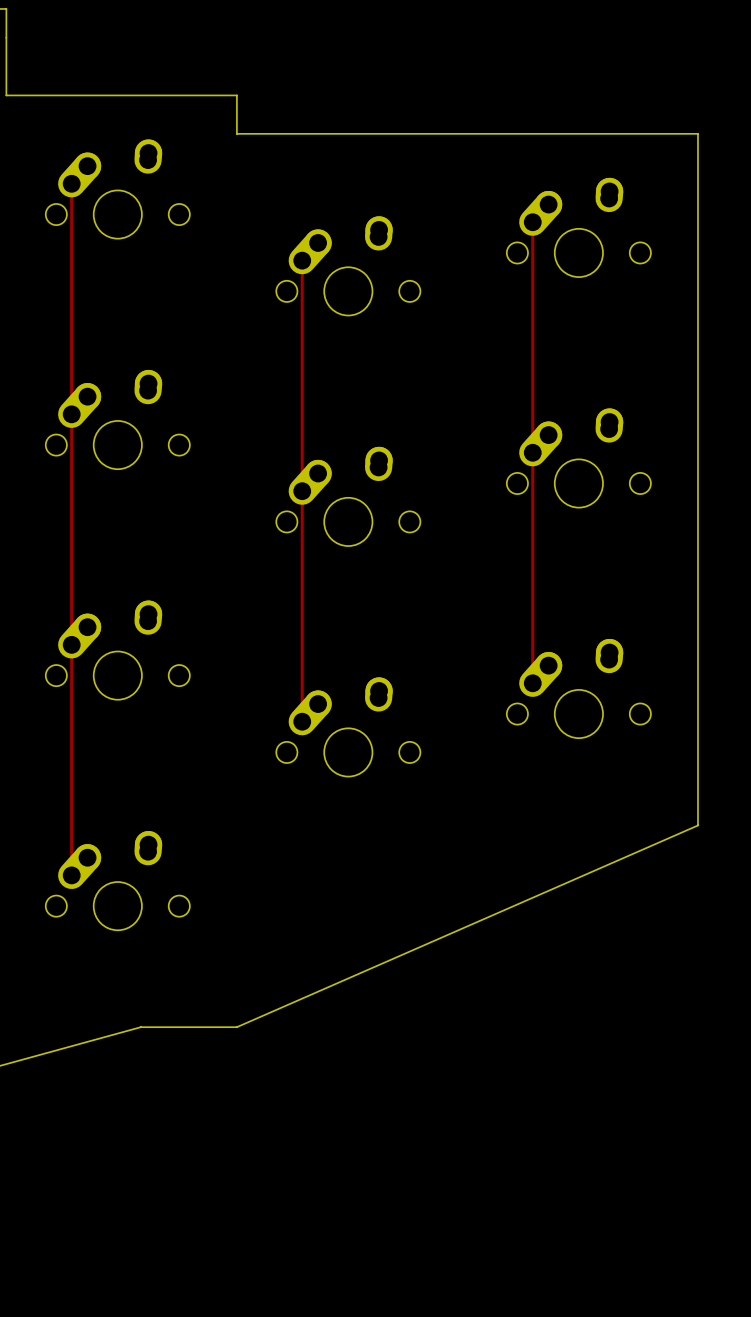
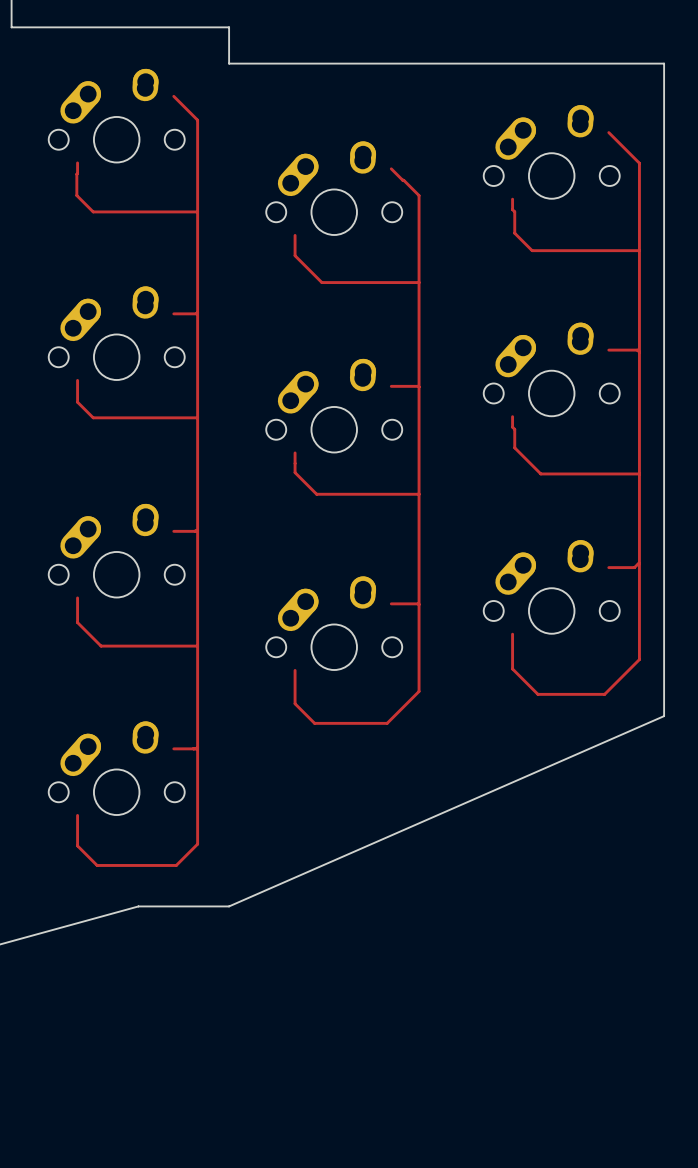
track: none -> (173, 96) (197, 120) (197, 844) (176, 865) (97, 865) (77, 845) (77, 815)
track: (71, 183) (71, 875) -> none
track: none -> (608, 132) (639, 163) (639, 659) (604, 694) (537, 694) (512, 668) (512, 634)
track: (532, 220) (532, 683) -> none
track: none -> (77, 162) (76, 195) (93, 211) (197, 211)
track: none -> (391, 168) (419, 195) (419, 691) (387, 723) (314, 723) (295, 703) (295, 670)
track: (302, 260) (302, 721) -> none
track: none -> (512, 199) (514, 233) (532, 250) (639, 250)
track: none -> (295, 235) (295, 255) (321, 282) (419, 282)
track: none -> (197, 312) (173, 313)
track: none -> (608, 350) (637, 350) (639, 352)
track: none -> (77, 380) (77, 402) (93, 417) (197, 417)
track: none -> (391, 386) (419, 386)
track: none -> (512, 416) (514, 447) (540, 473) (639, 473)
track: none -> (295, 452) (295, 472) (316, 494) (419, 494)
track: none -> (197, 530) (173, 531)
track: none -> (639, 563) (634, 567) (608, 567)
track: none -> (77, 597) (77, 622) (101, 646) (197, 646)
track: none -> (391, 603) (419, 604)
track: none -> (197, 747) (173, 748)

